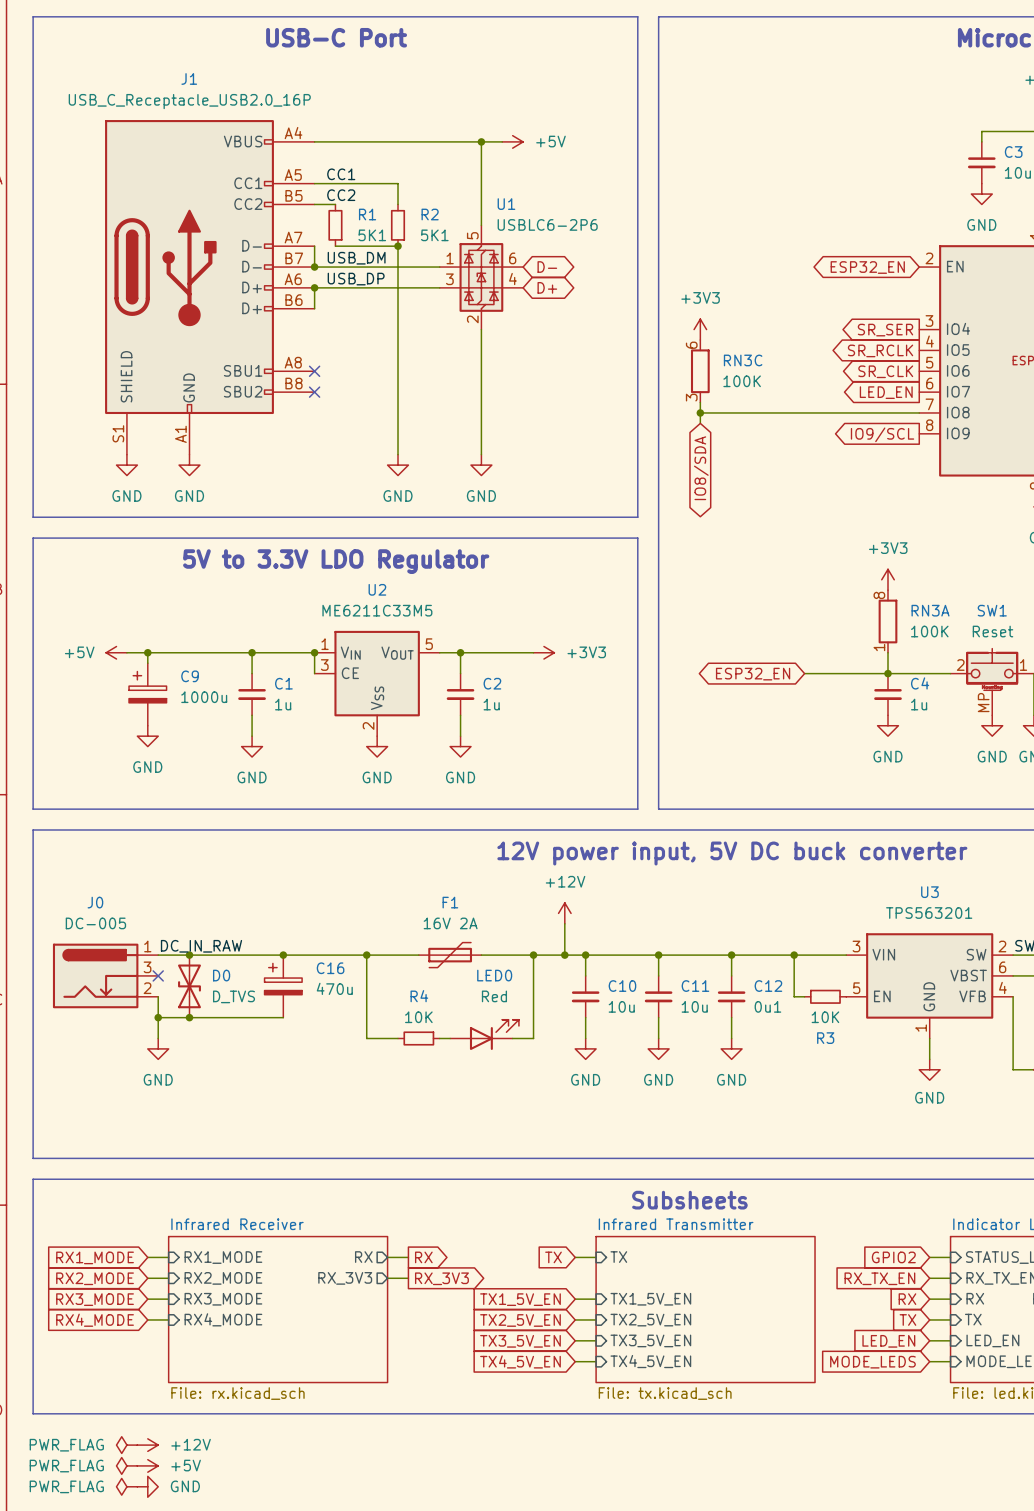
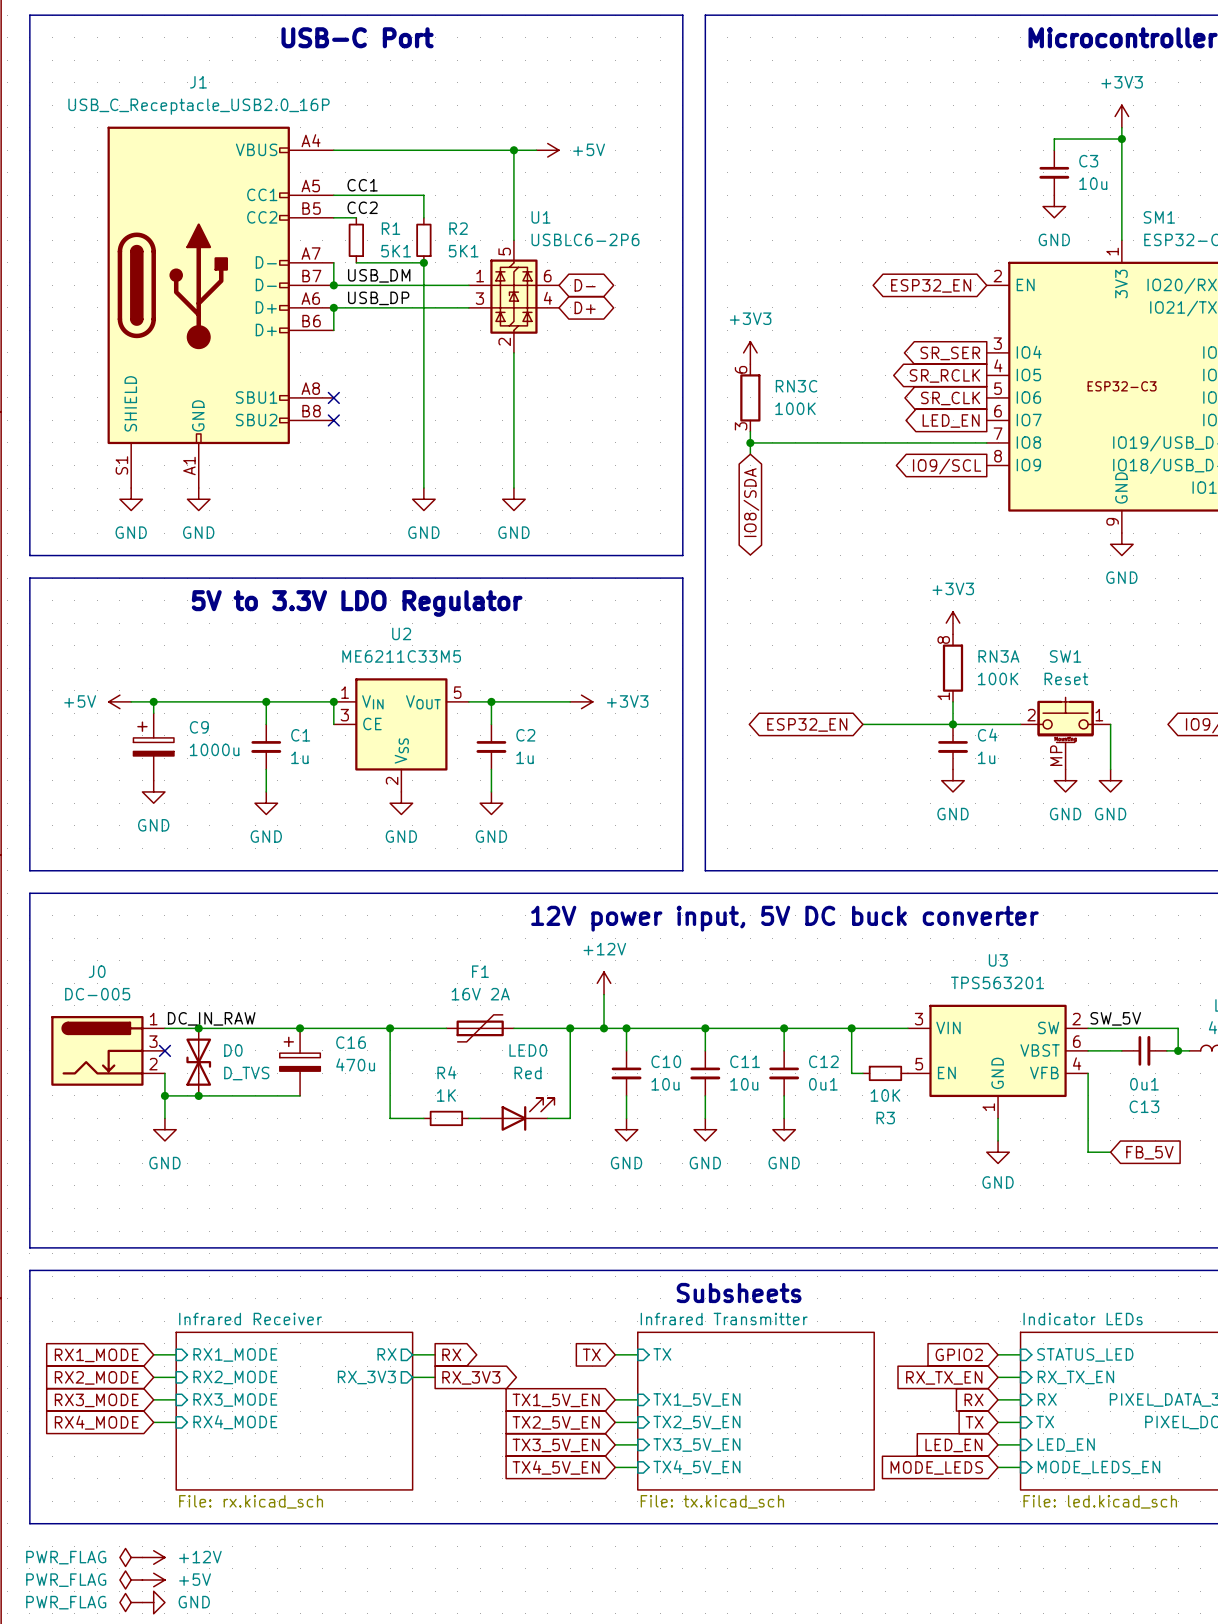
R4 value: 10K (418, 1017) -> 1K (446, 1095)

